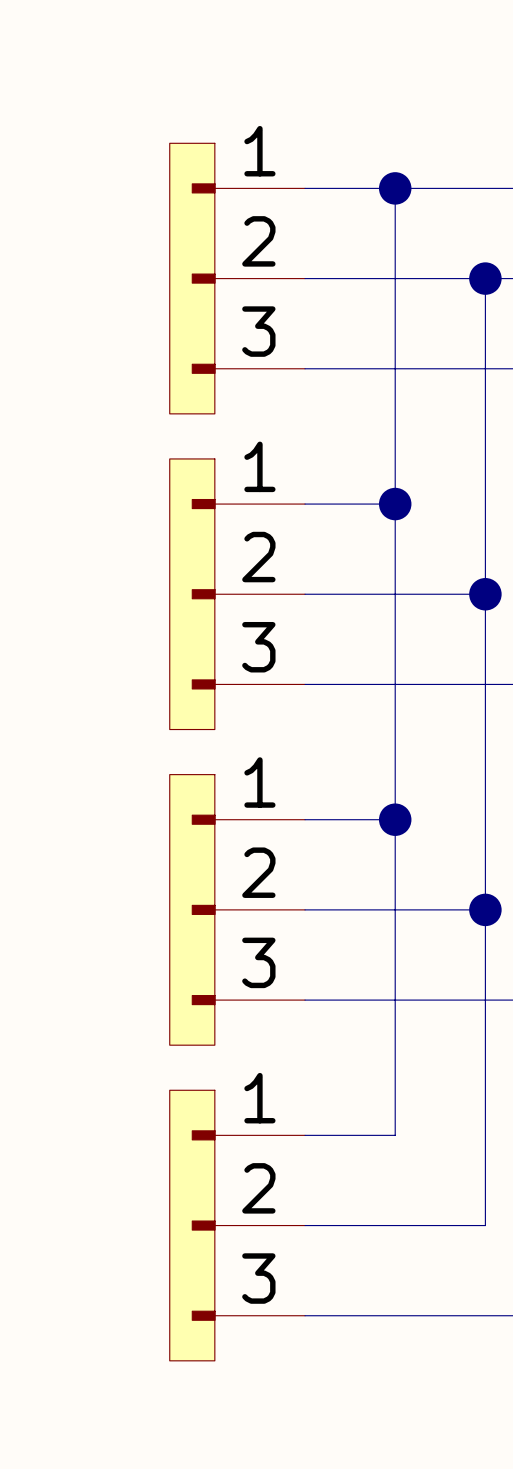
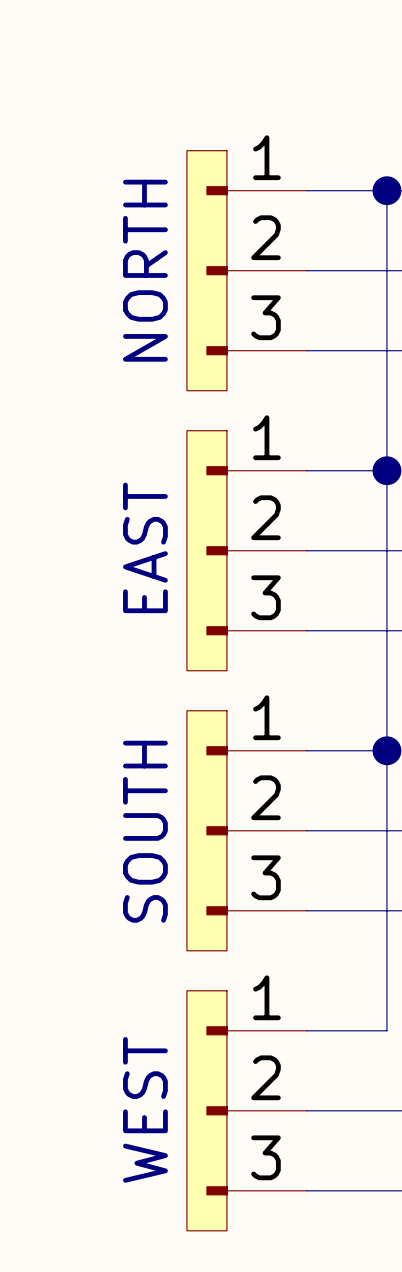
part value: none -> NORTH (145, 270)
part value: none -> EAST (145, 547)
part value: none -> SOUTH (145, 831)
part value: none -> WEST (145, 1109)

